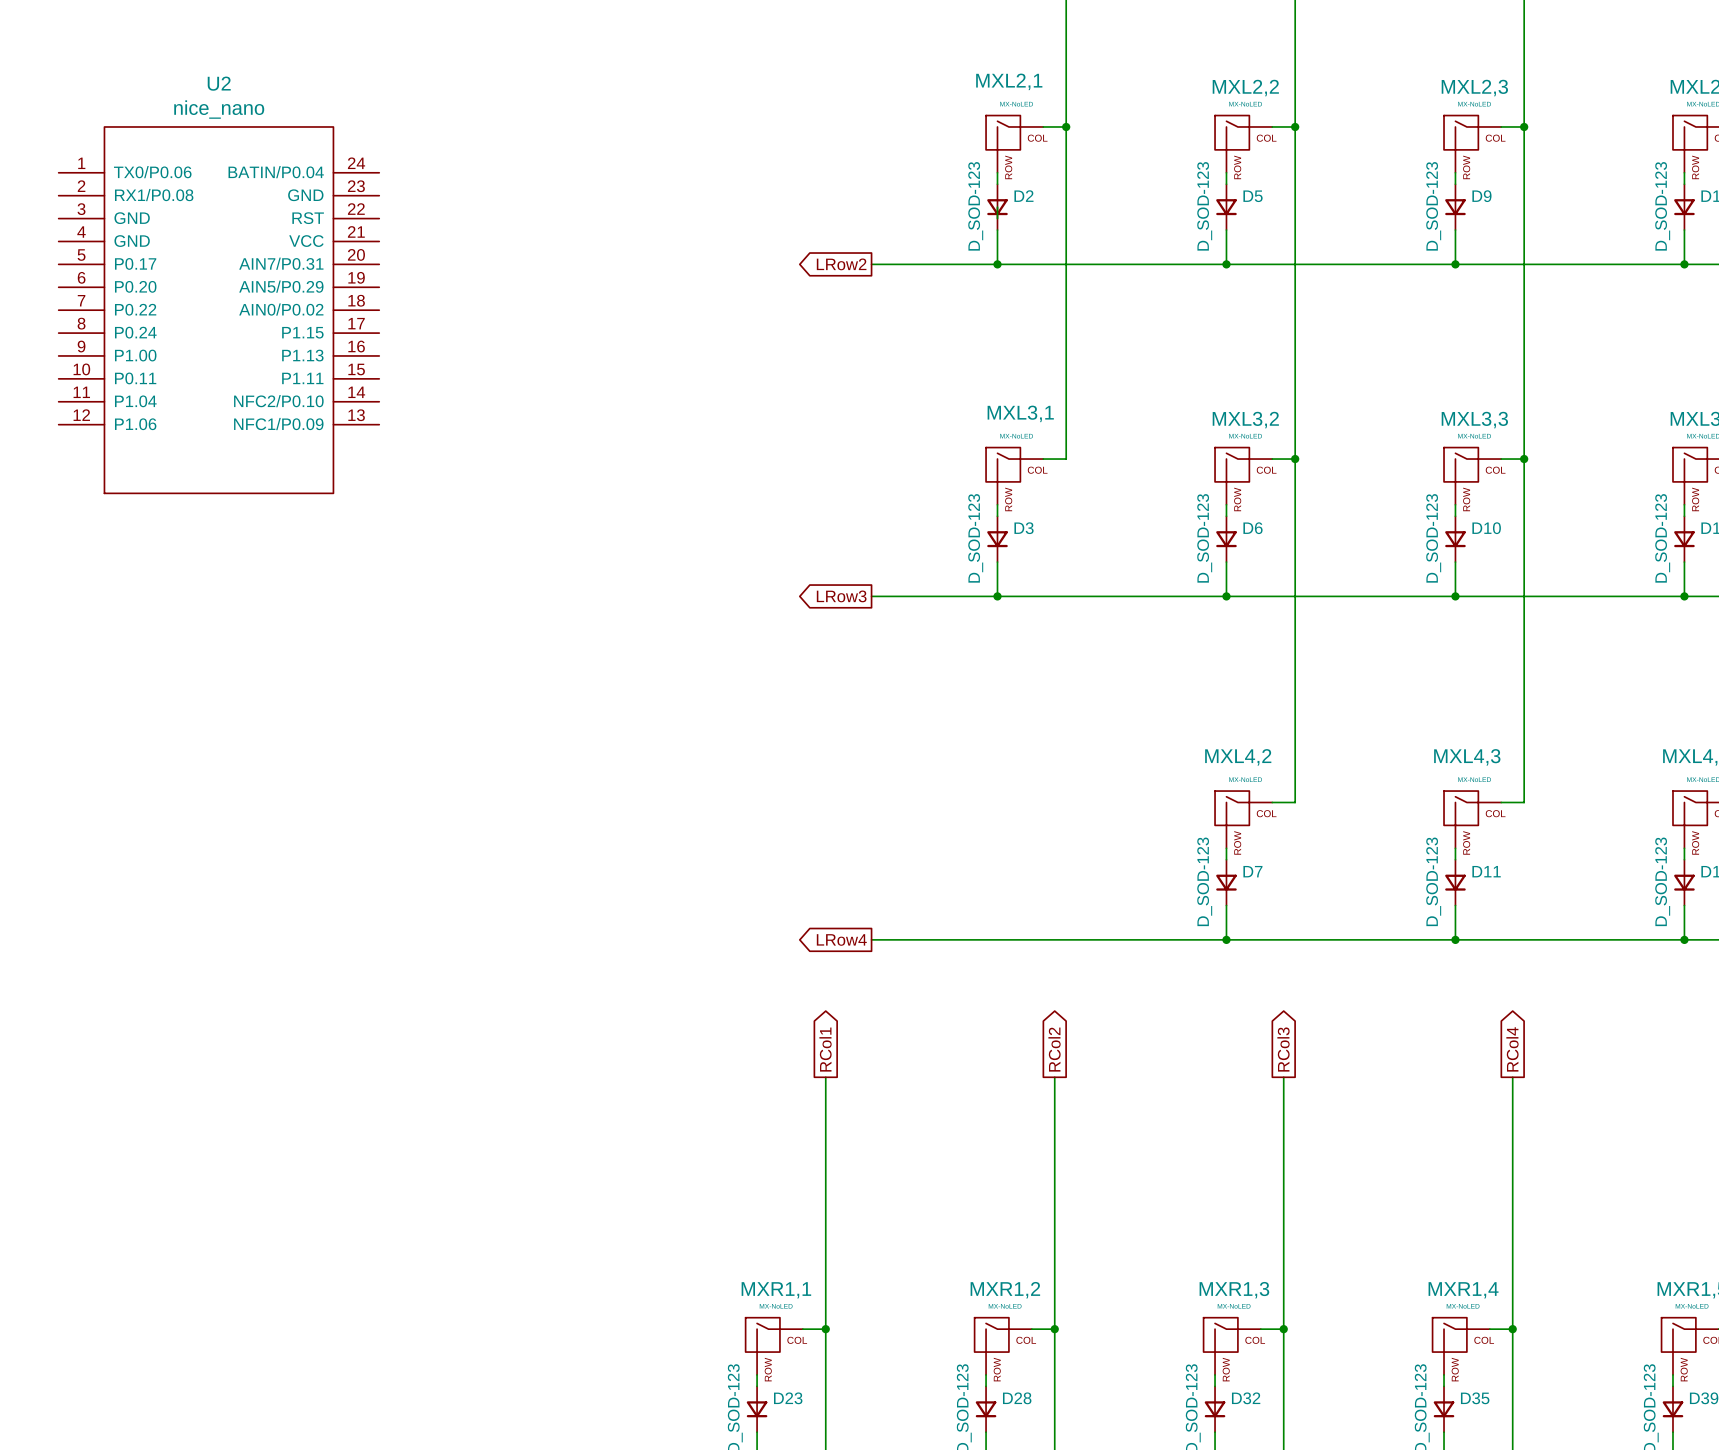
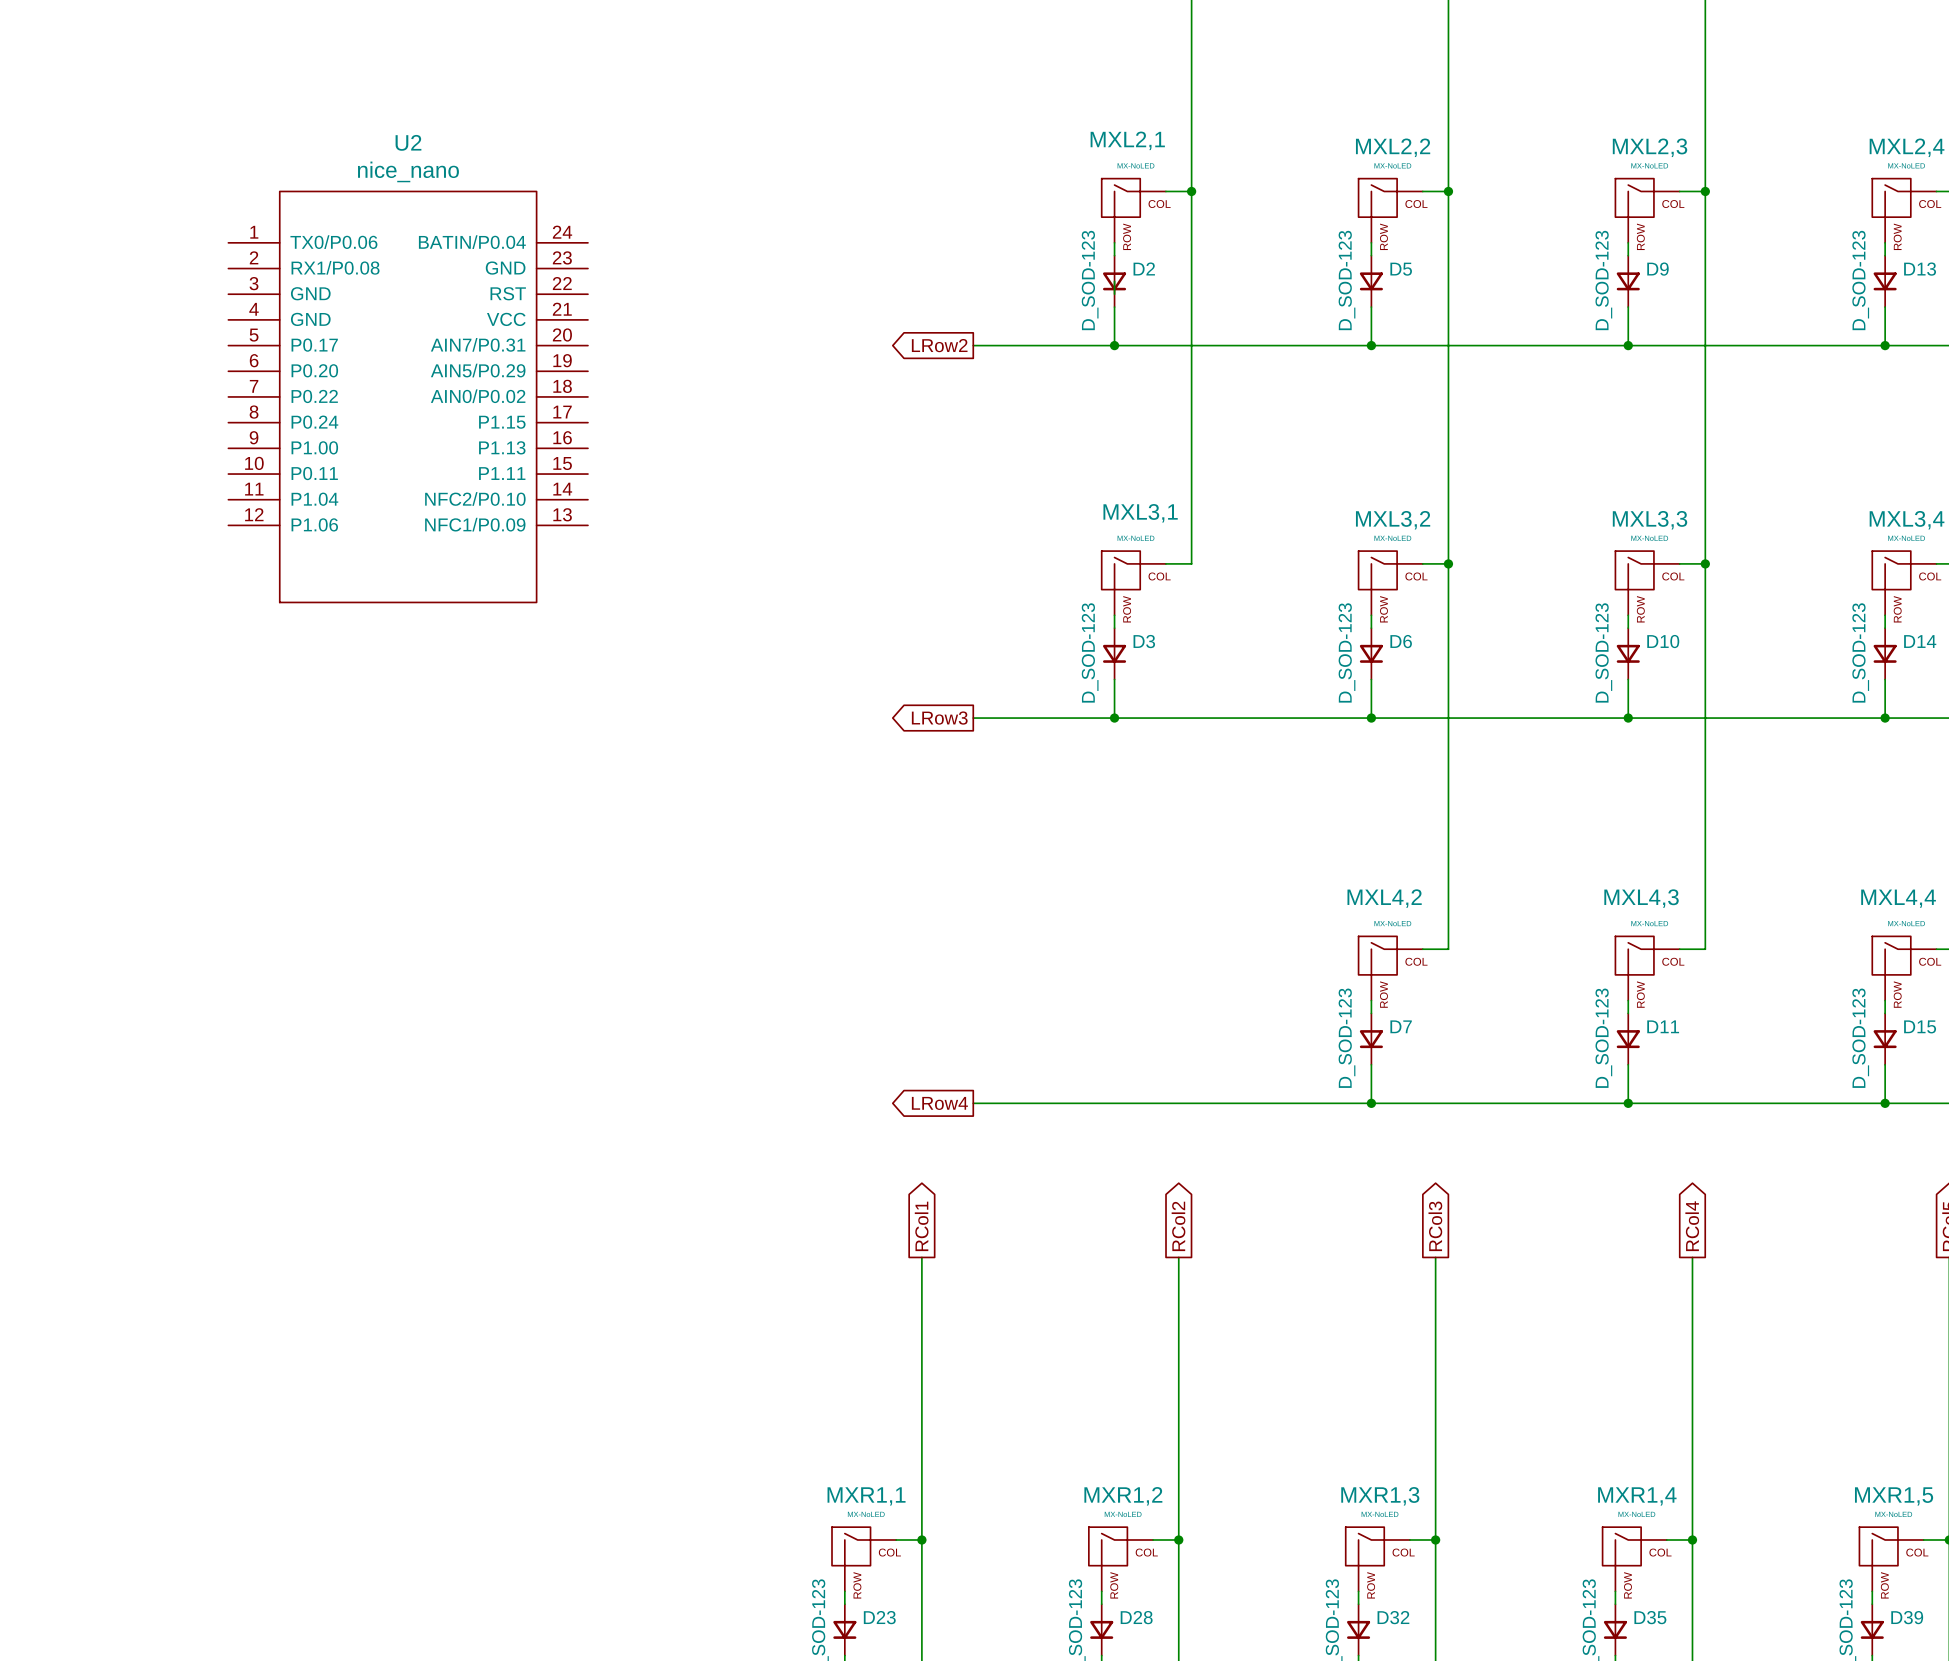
U2 position: (218, 310) -> (408, 396)

